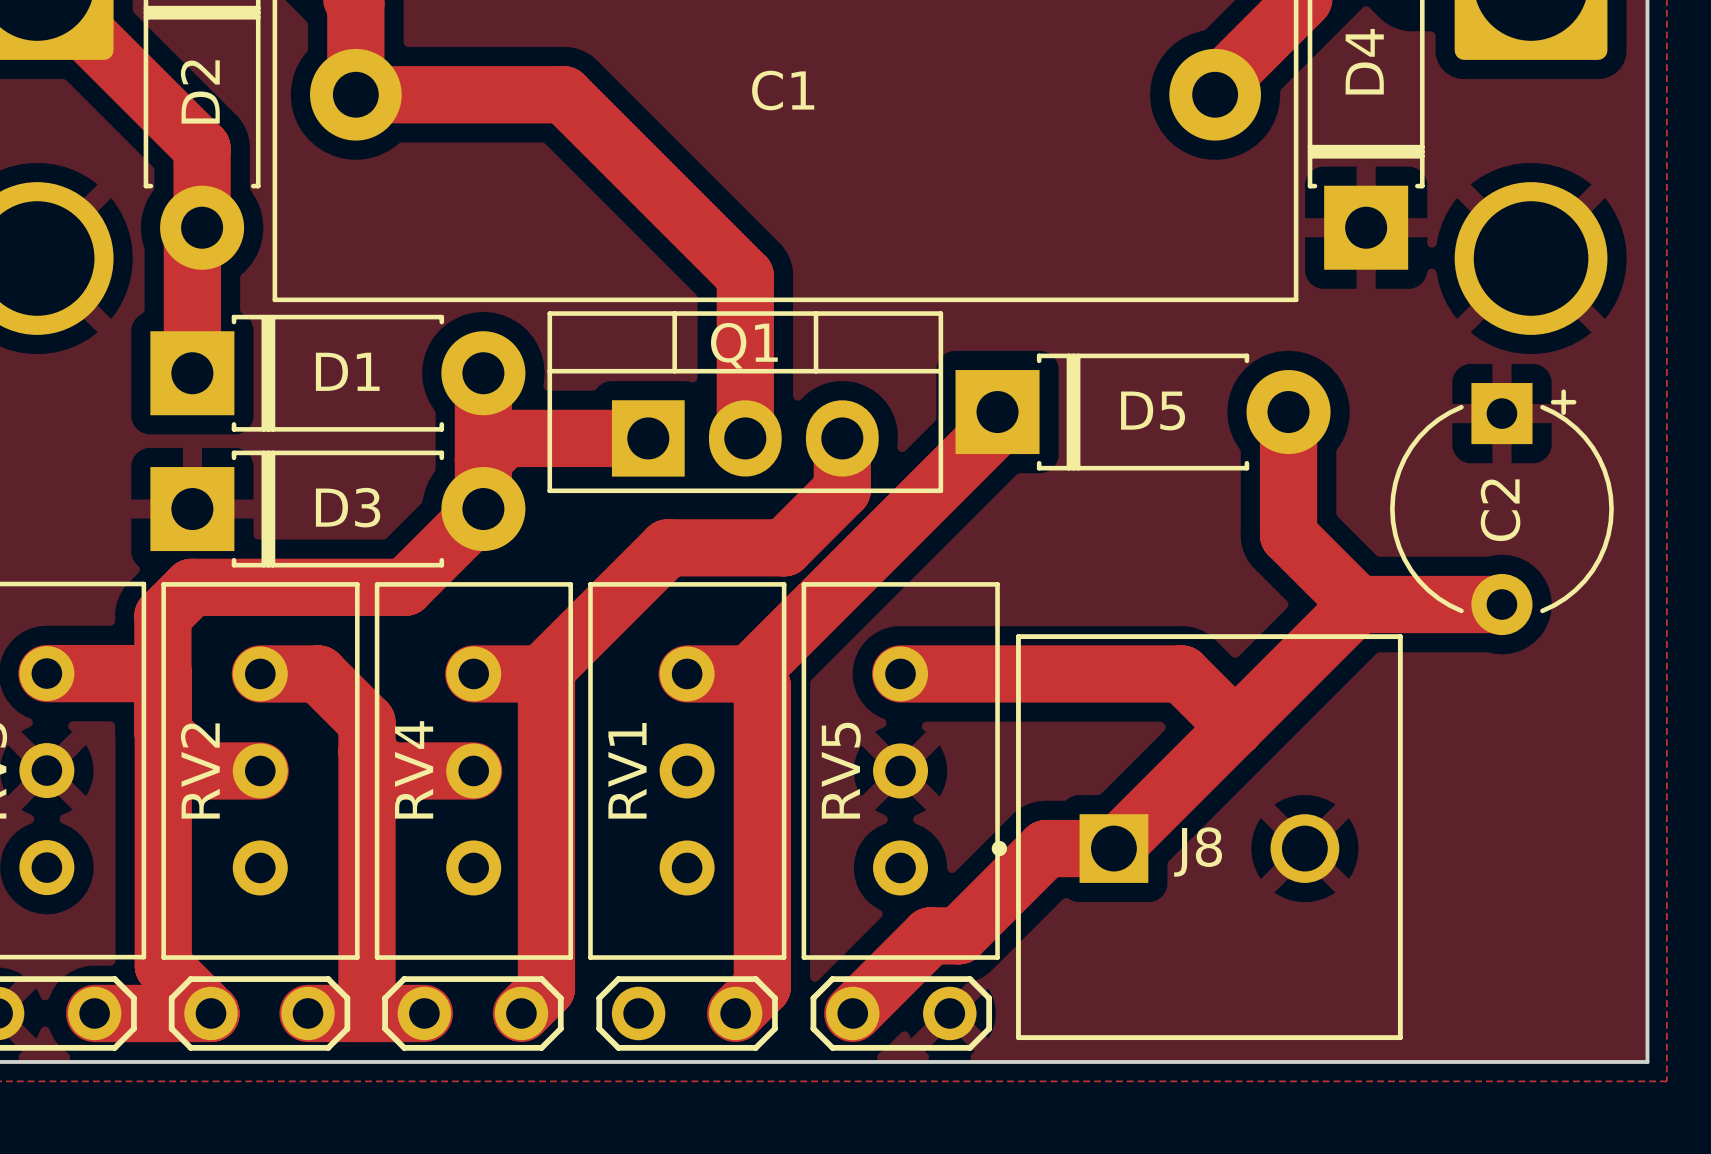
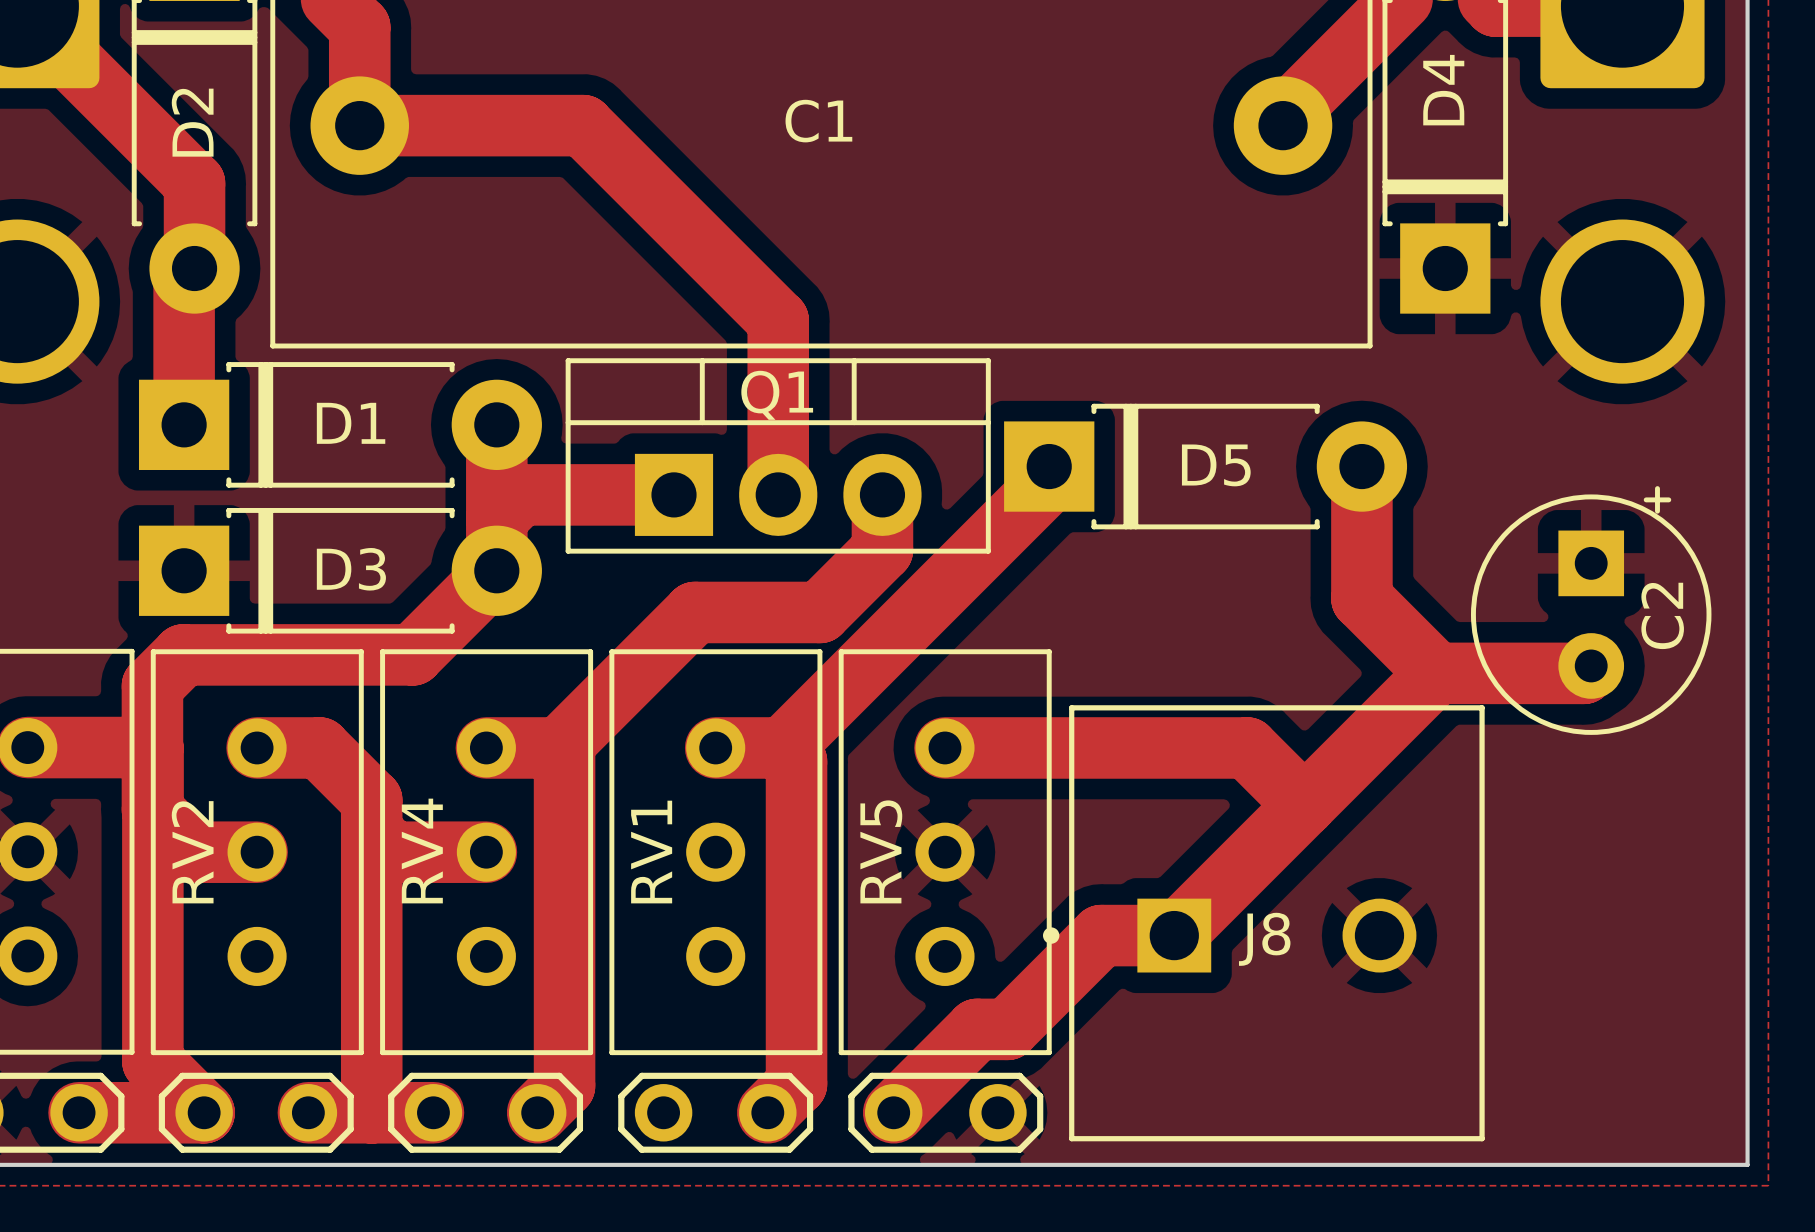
C2 footprint: [1390, 383, 1614, 636] -> [1470, 486, 1712, 735]

